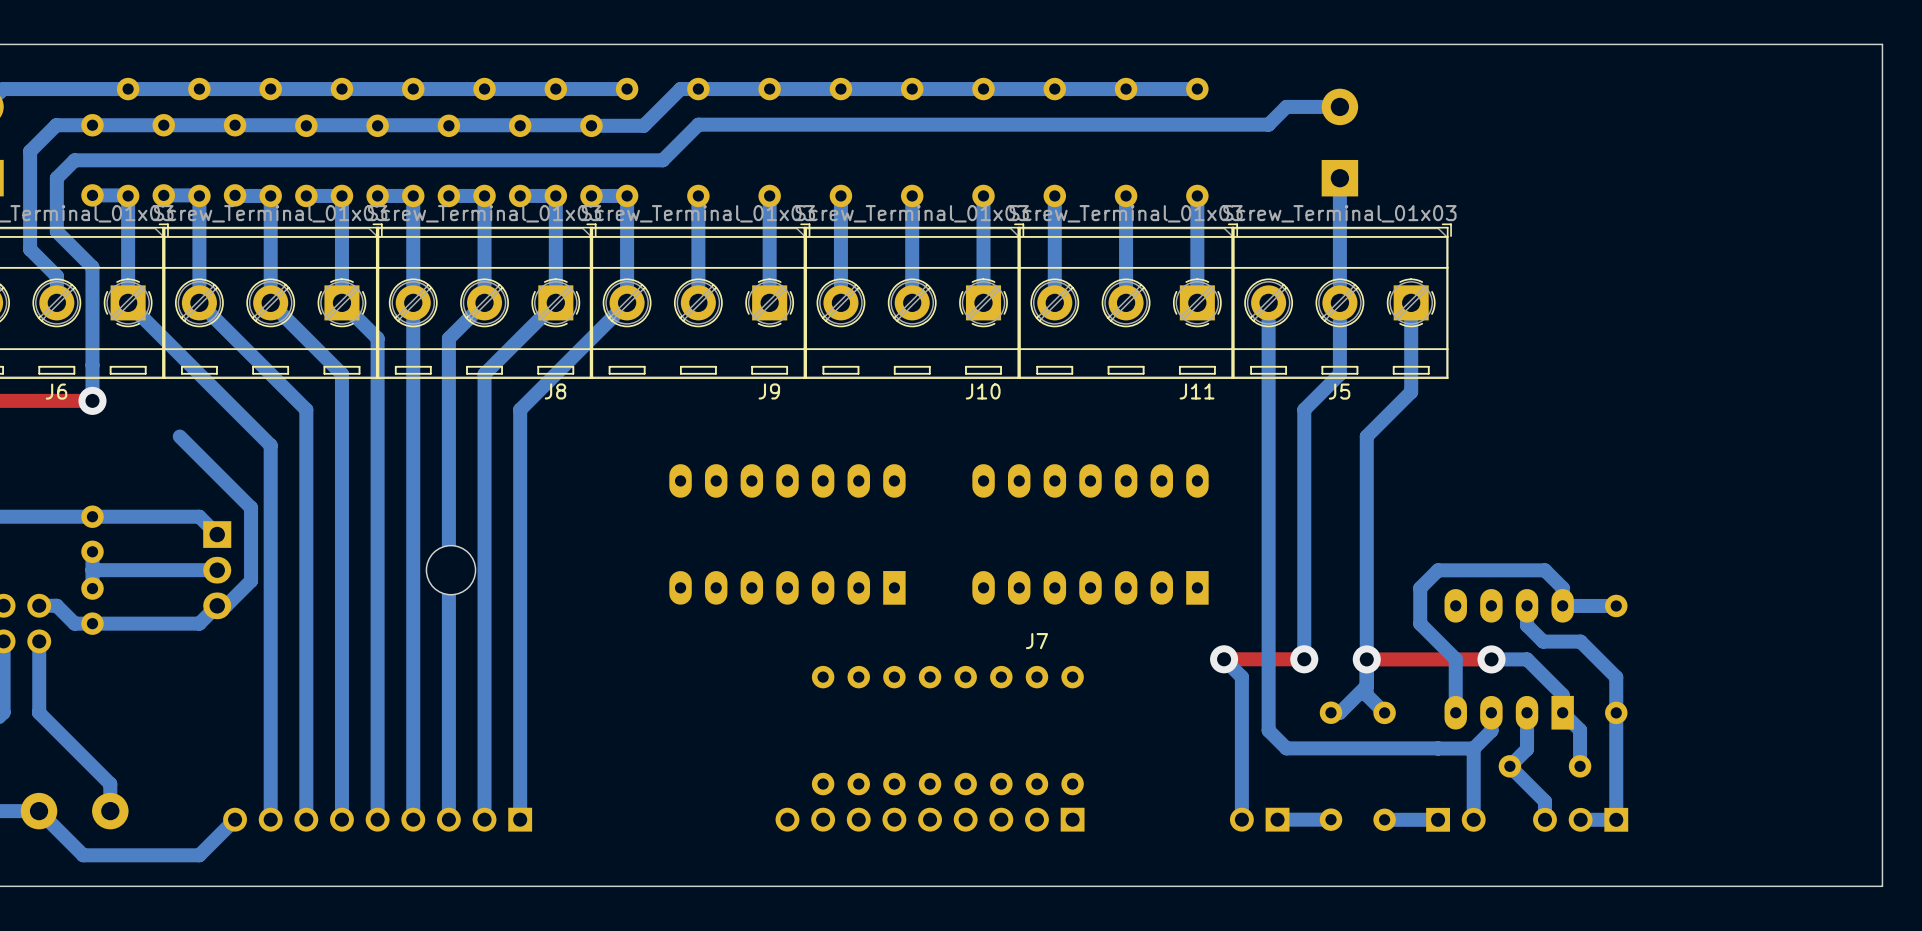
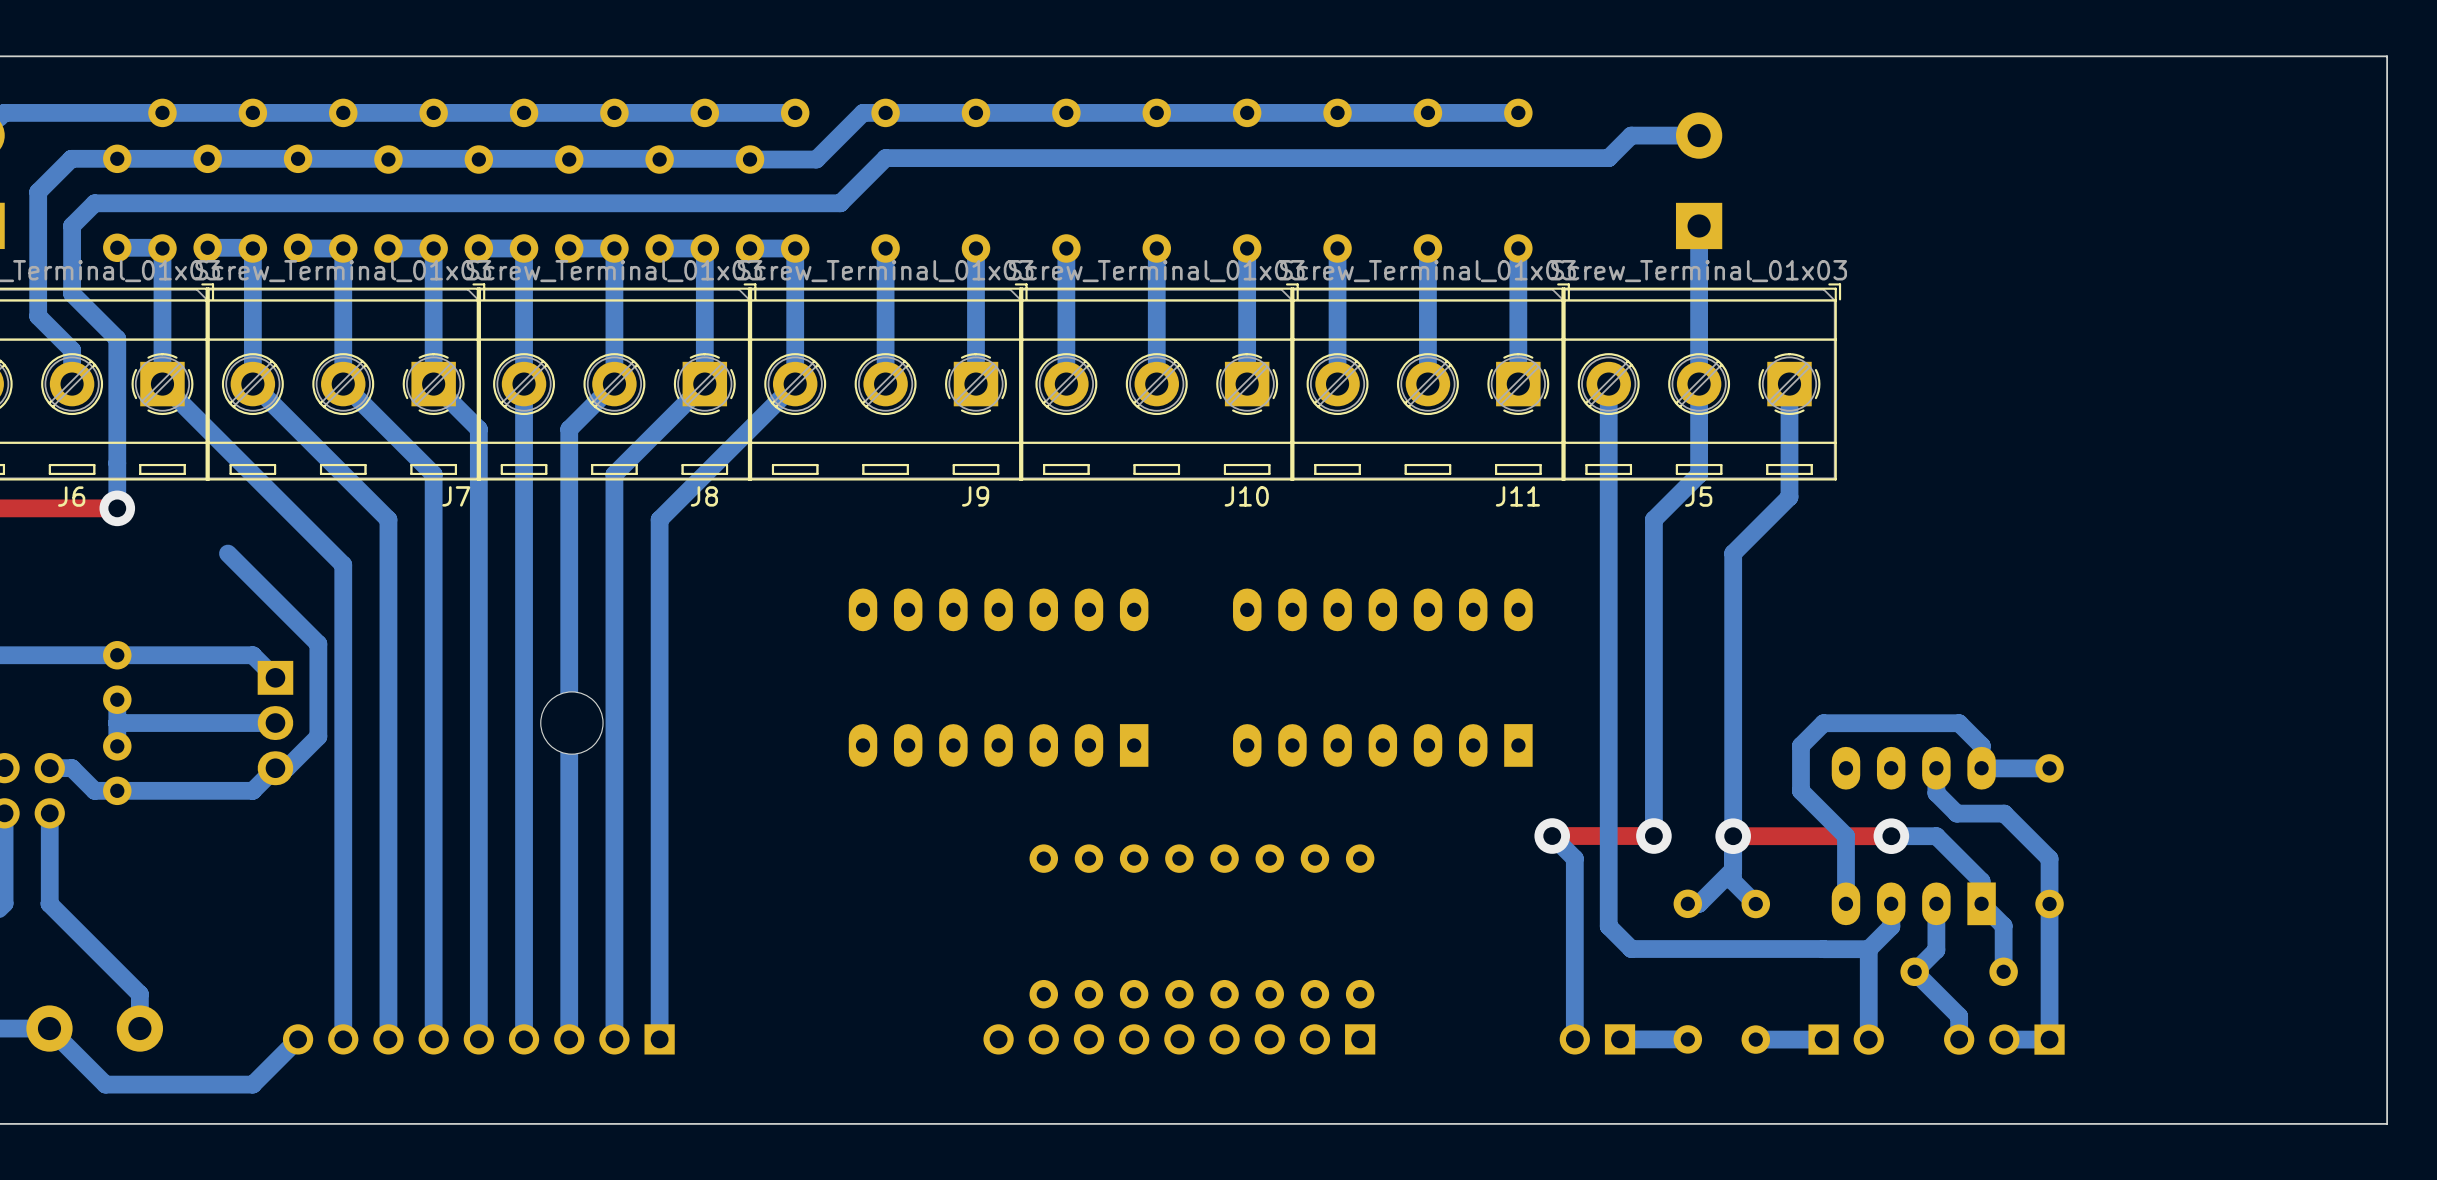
J7 name position: J7 (1036, 641) -> J7 (456, 496)

